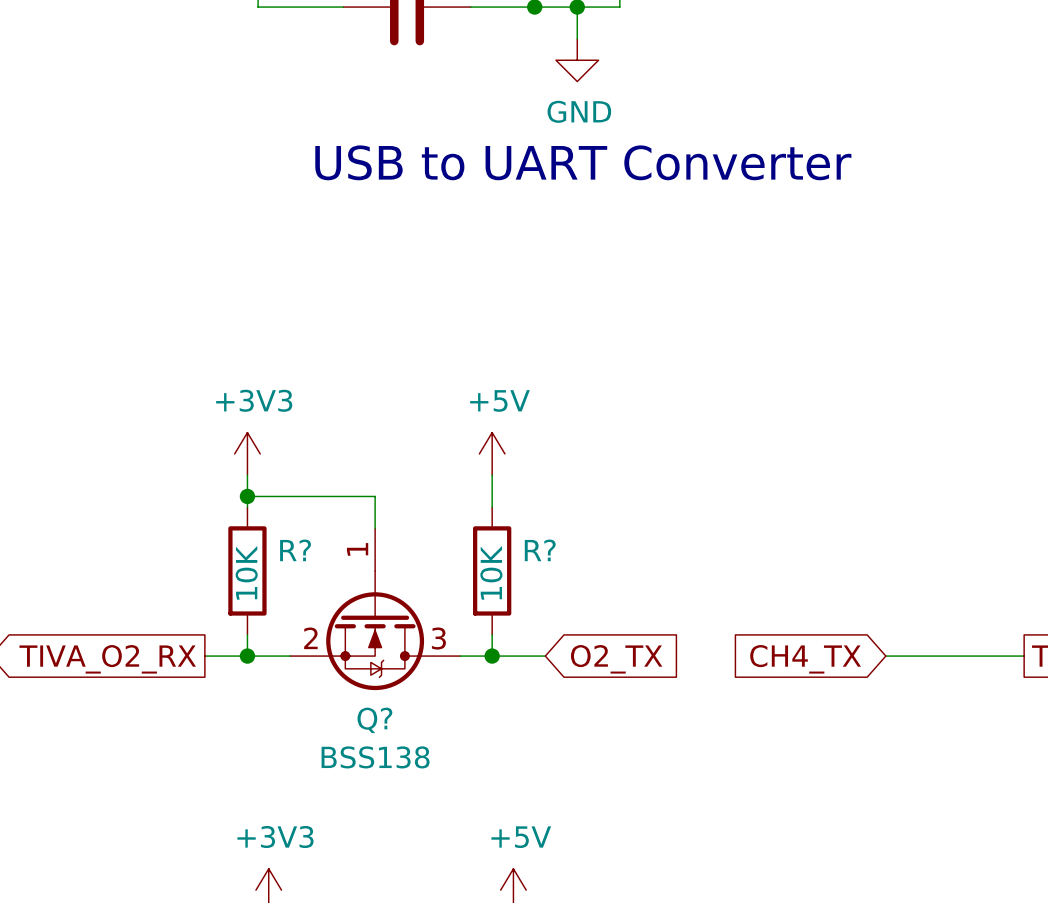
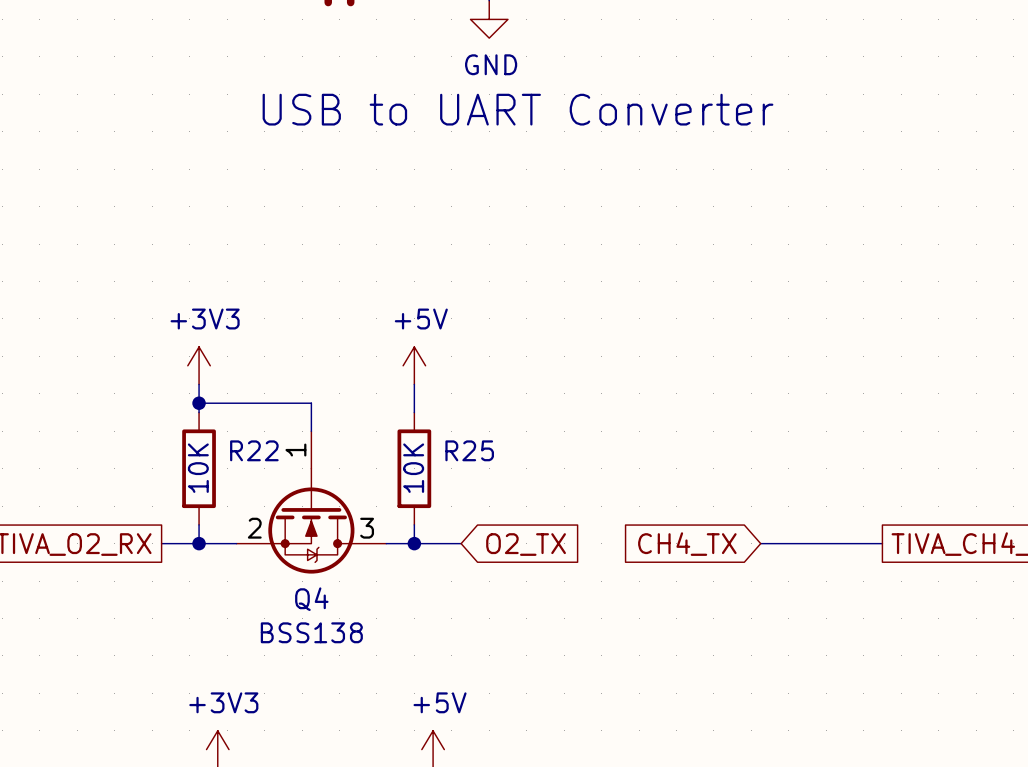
R? name: R? (295, 550) -> R22 (254, 450)
R? name: R? (540, 550) -> R25 (469, 450)
Q? name: Q? (374, 720) -> Q4 (311, 599)

